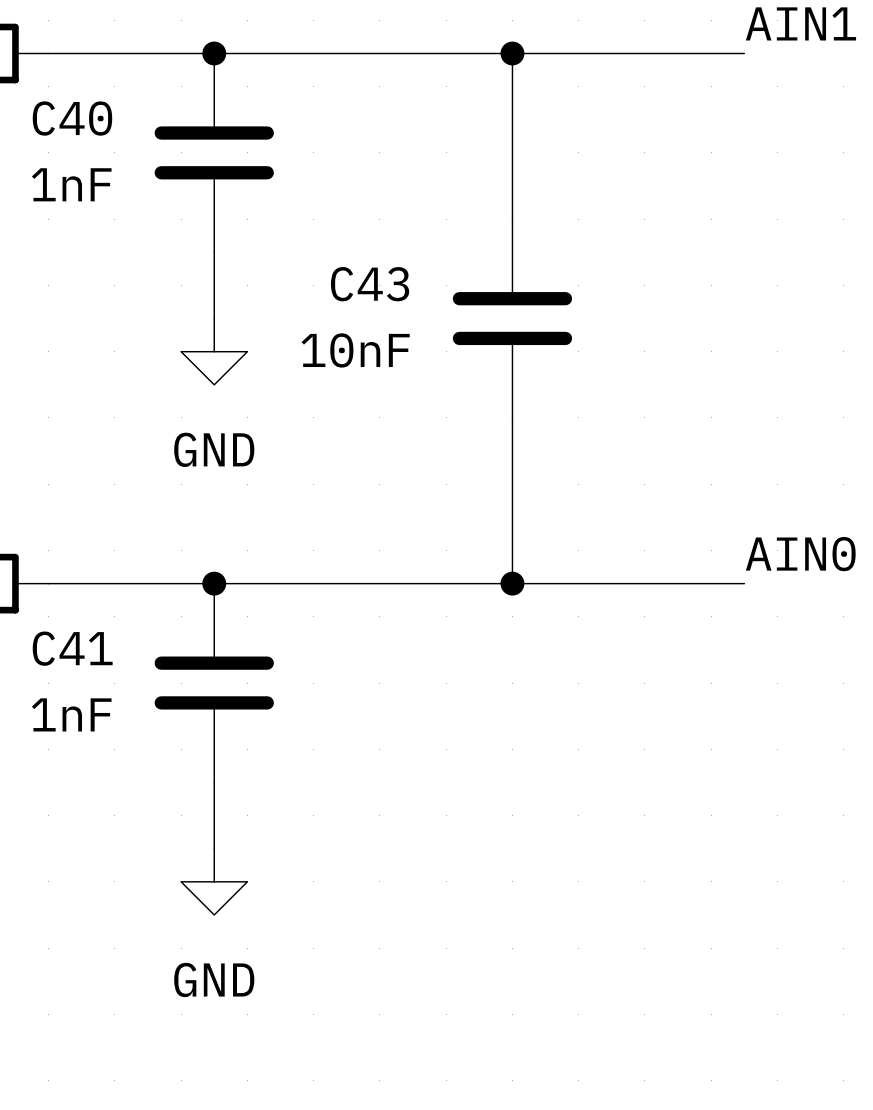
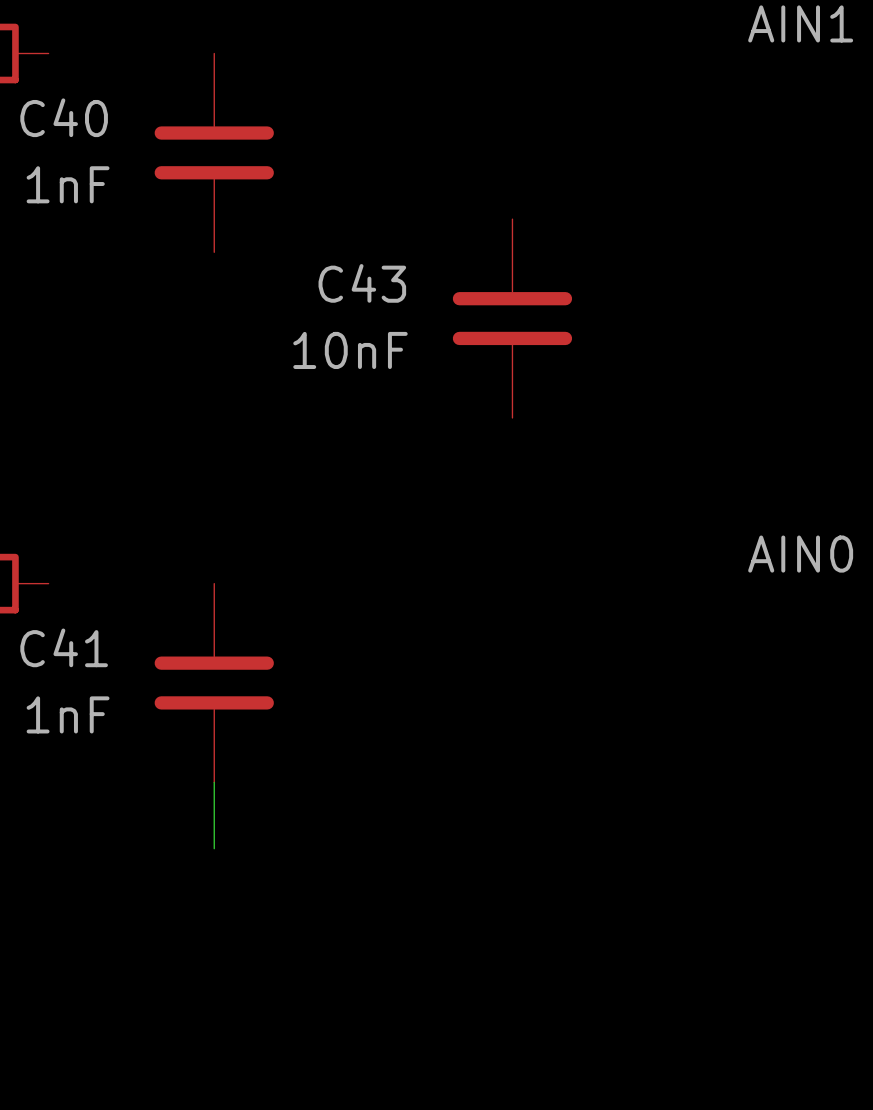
wire: (48, 53) (744, 53) -> none
junction: (214, 53) -> none
wire: (512, 53) (512, 219) -> none
junction: (512, 53) -> none
wire: (214, 252) (214, 318) -> none
power symbol: GND (214, 351) -> none
wire: (512, 417) (512, 583) -> none
wire: (48, 583) (744, 583) -> none
junction: (214, 583) -> none
junction: (512, 583) -> none
power symbol: GND (214, 881) -> none

